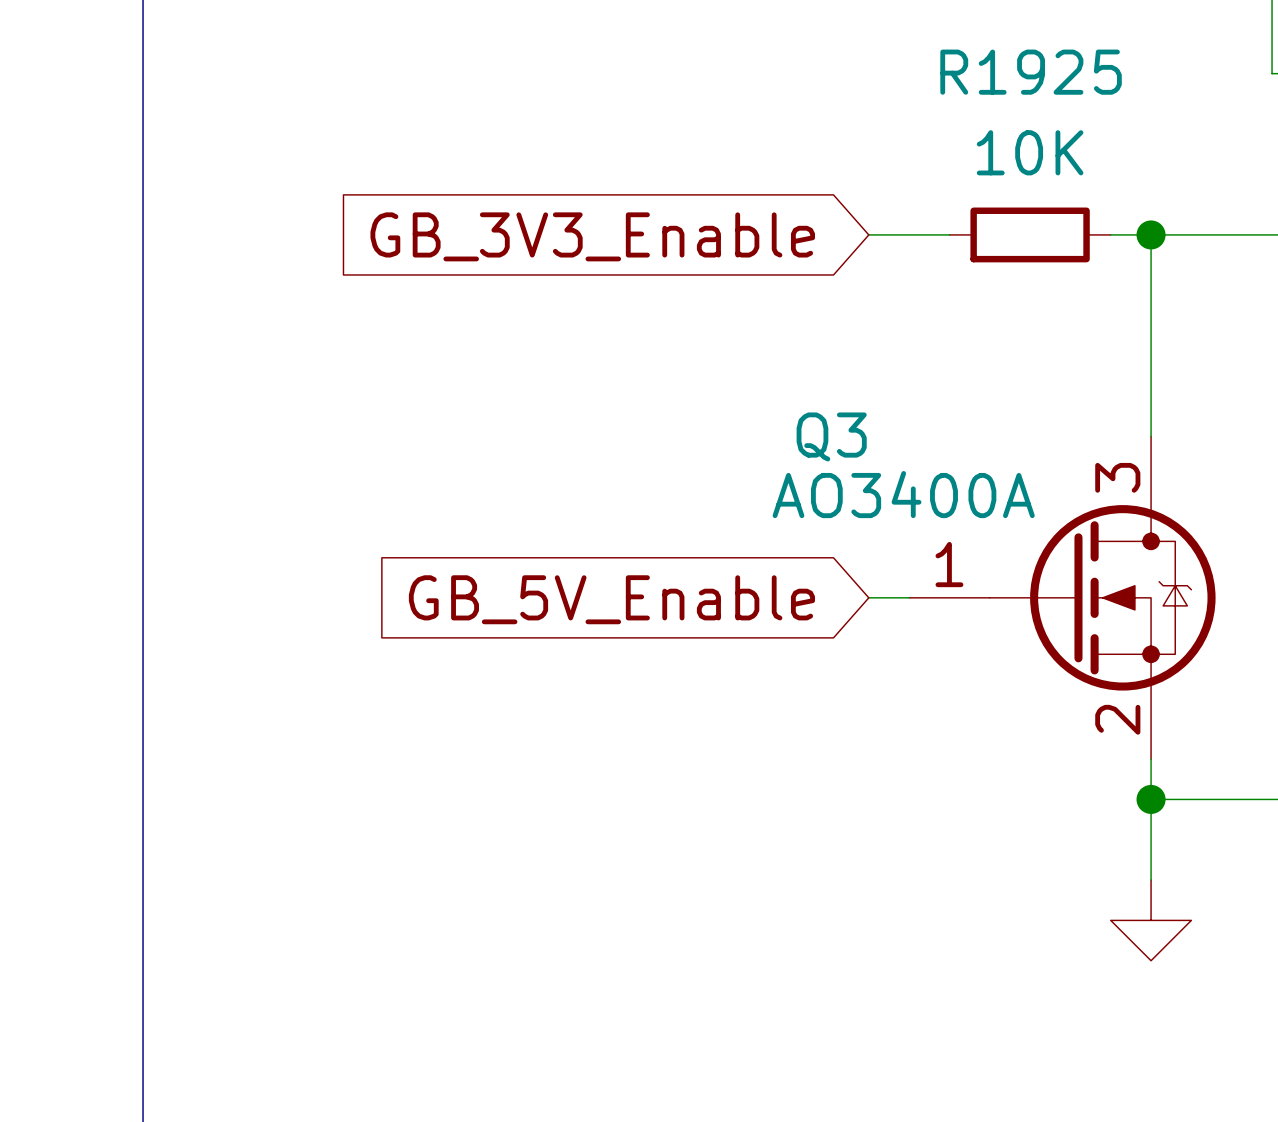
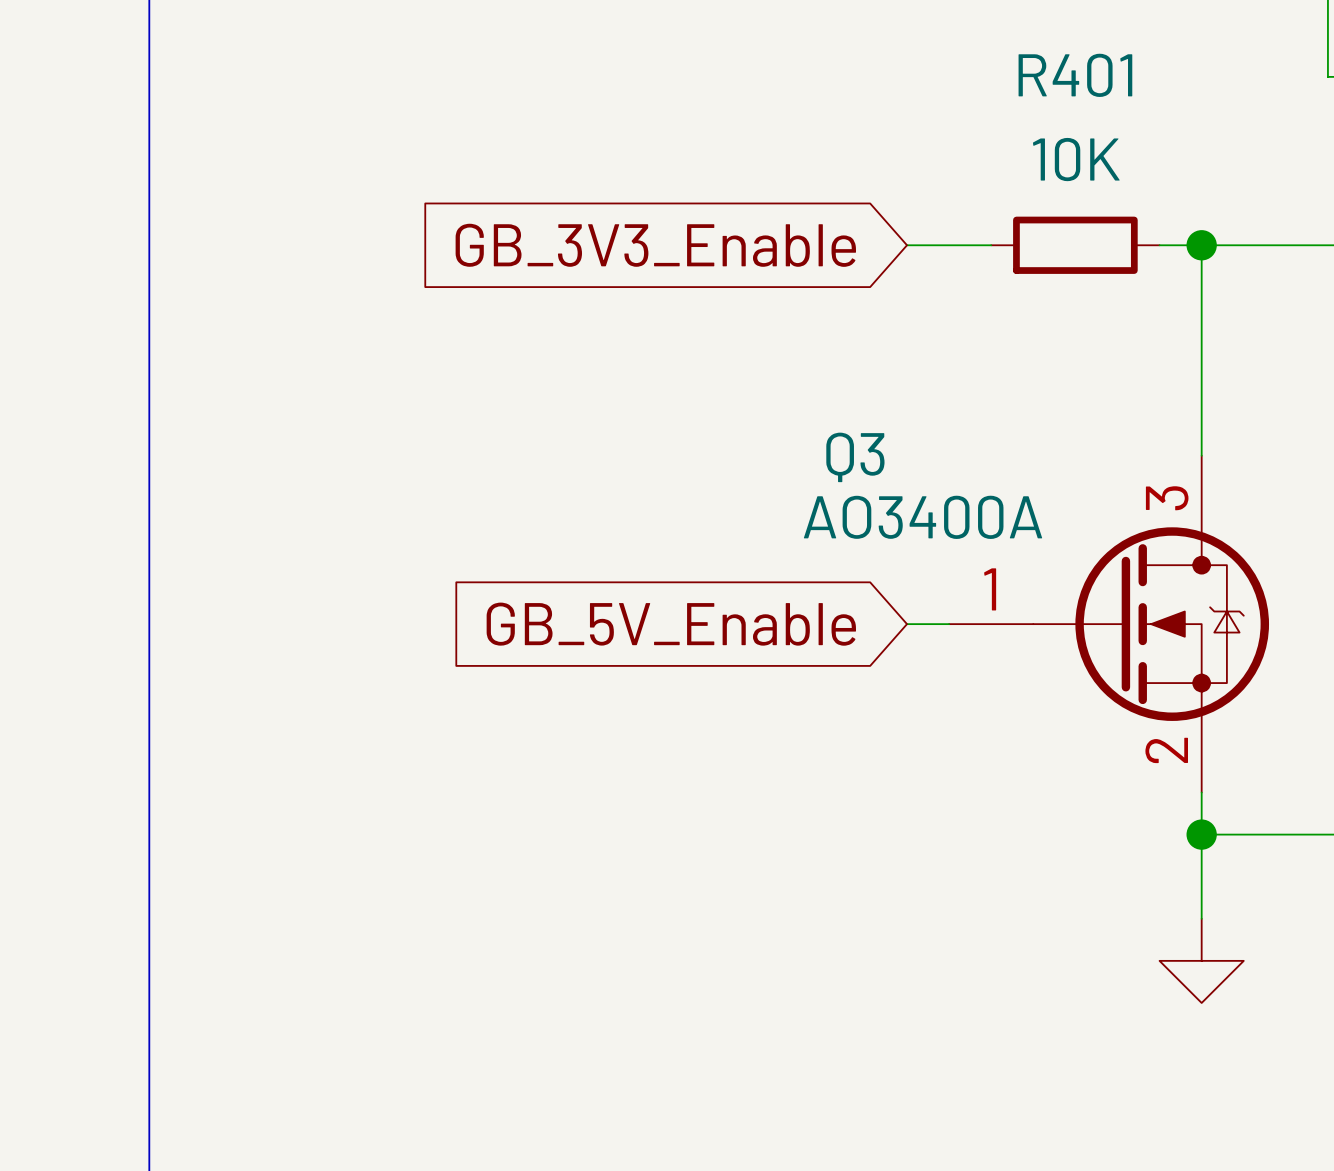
R1925 name: R1925 (1031, 72) -> R401 (1075, 75)

